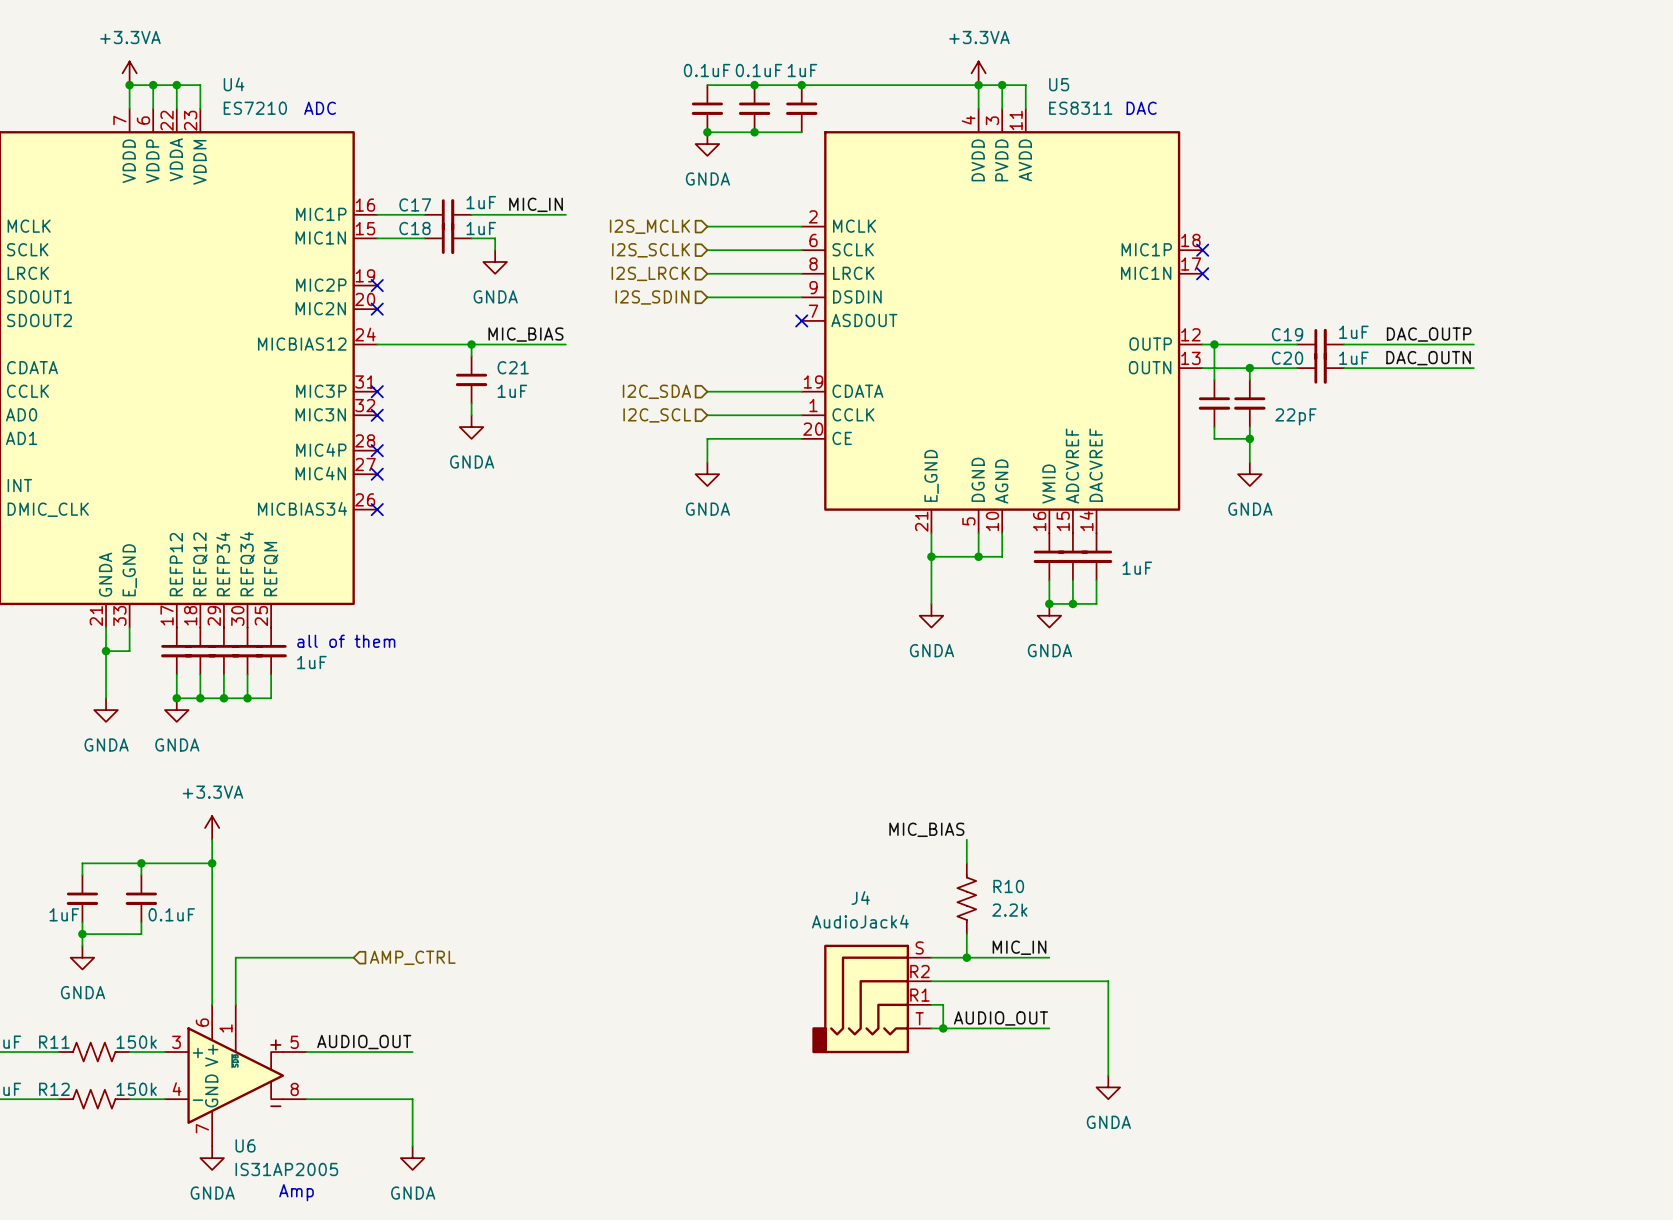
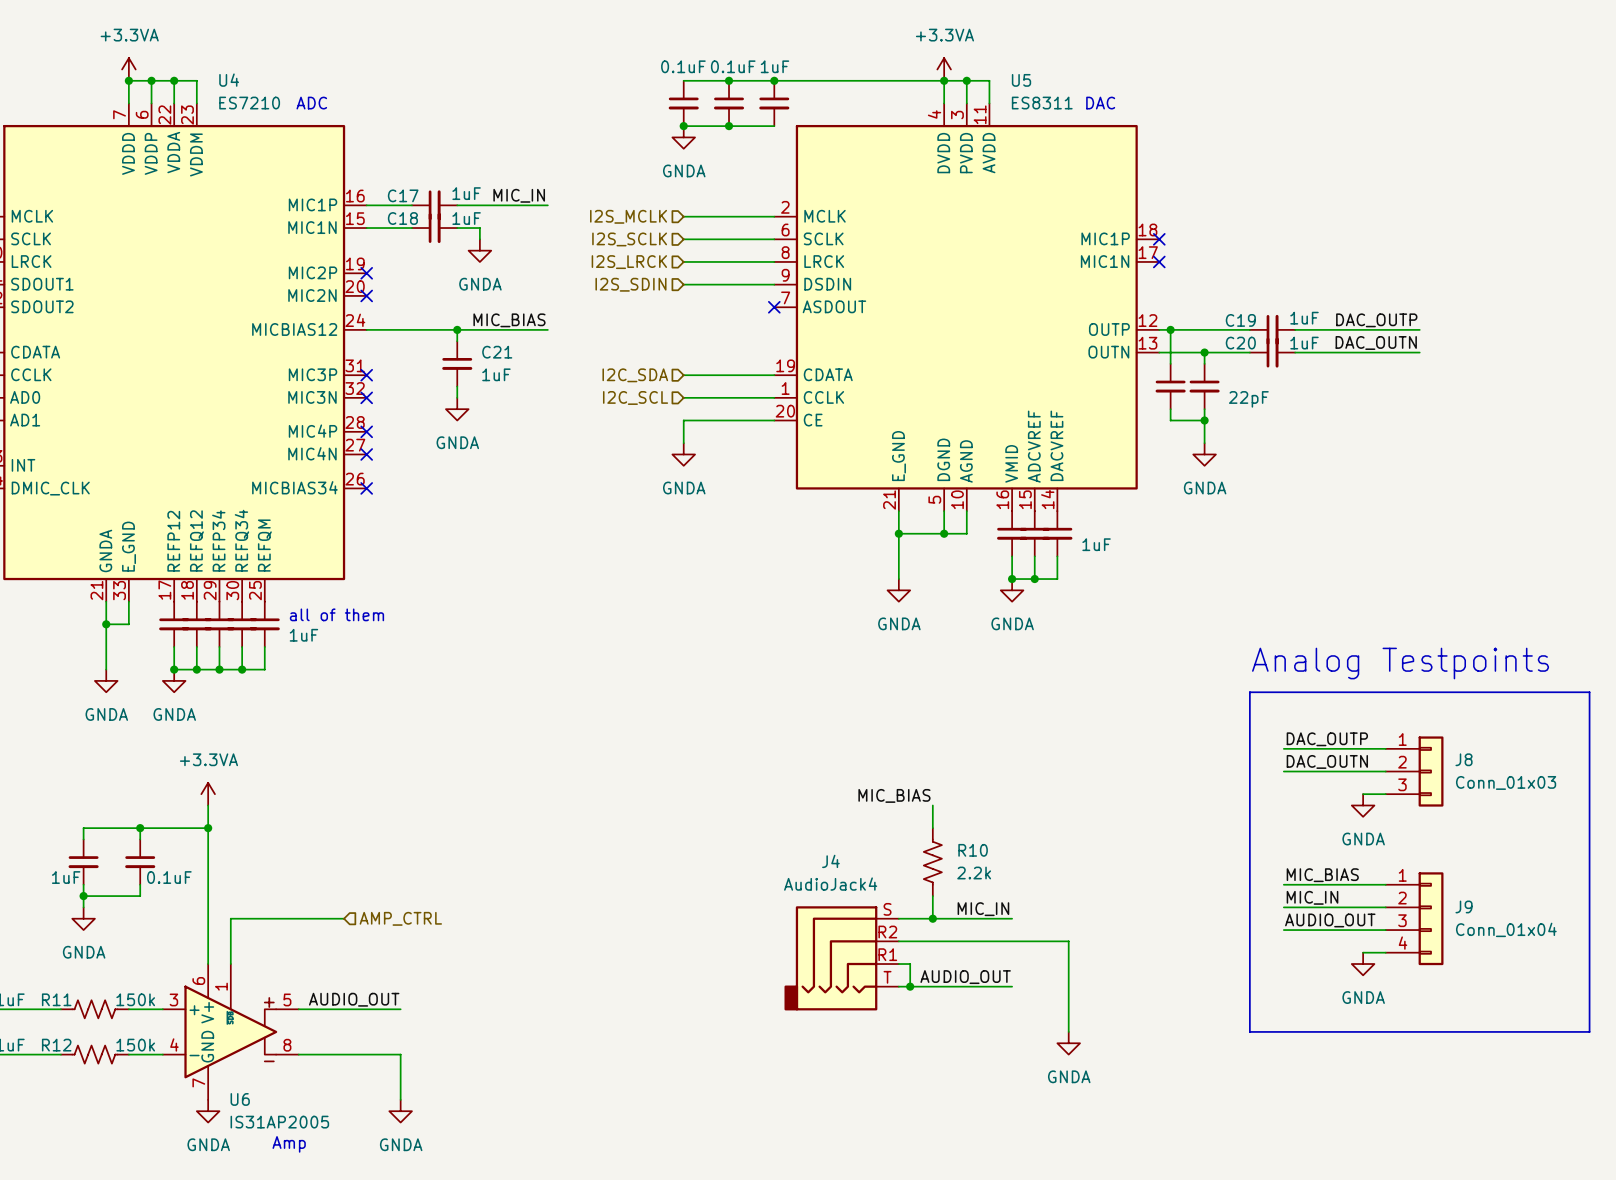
text: none -> Analog Testpoints (1400, 663)
line: none -> (1249, 692) (1589, 692) (1589, 1031) (1249, 1031) (1249, 692)
label: none -> DAC_OUTP (1327, 739)
wire: none -> (1283, 748) (1385, 748)
label: none -> DAC_OUTN (1327, 761)
wire: none -> (1283, 771) (1385, 771)
J8: none -> Conn_01x03 (1414, 771)
wire: none -> (1363, 794) (1385, 794)
power symbol: none -> GNDA (1363, 805)
label: none -> MIC_BIAS (1322, 875)
wire: none -> (1283, 884) (1385, 884)
label: none -> MIC_IN (1312, 897)
wire: none -> (1283, 907) (1385, 907)
J9: none -> Conn_01x04 (1414, 918)
label: none -> AUDIO_OUT (1330, 920)
wire: none -> (1283, 930) (1385, 930)
wire: none -> (1363, 952) (1385, 952)
power symbol: none -> GNDA (1363, 964)

